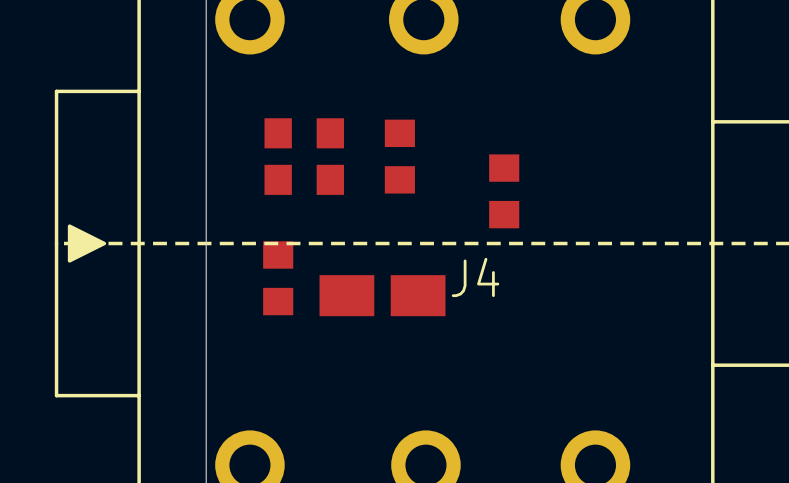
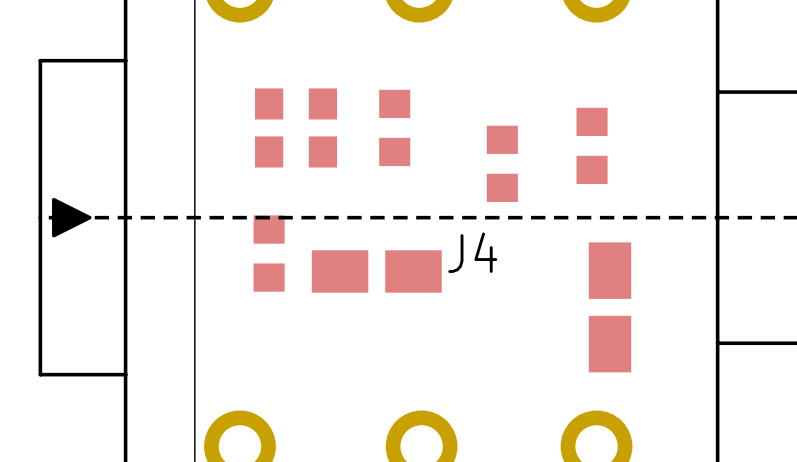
part: none -> (592, 145)
part: none -> (609, 307)

